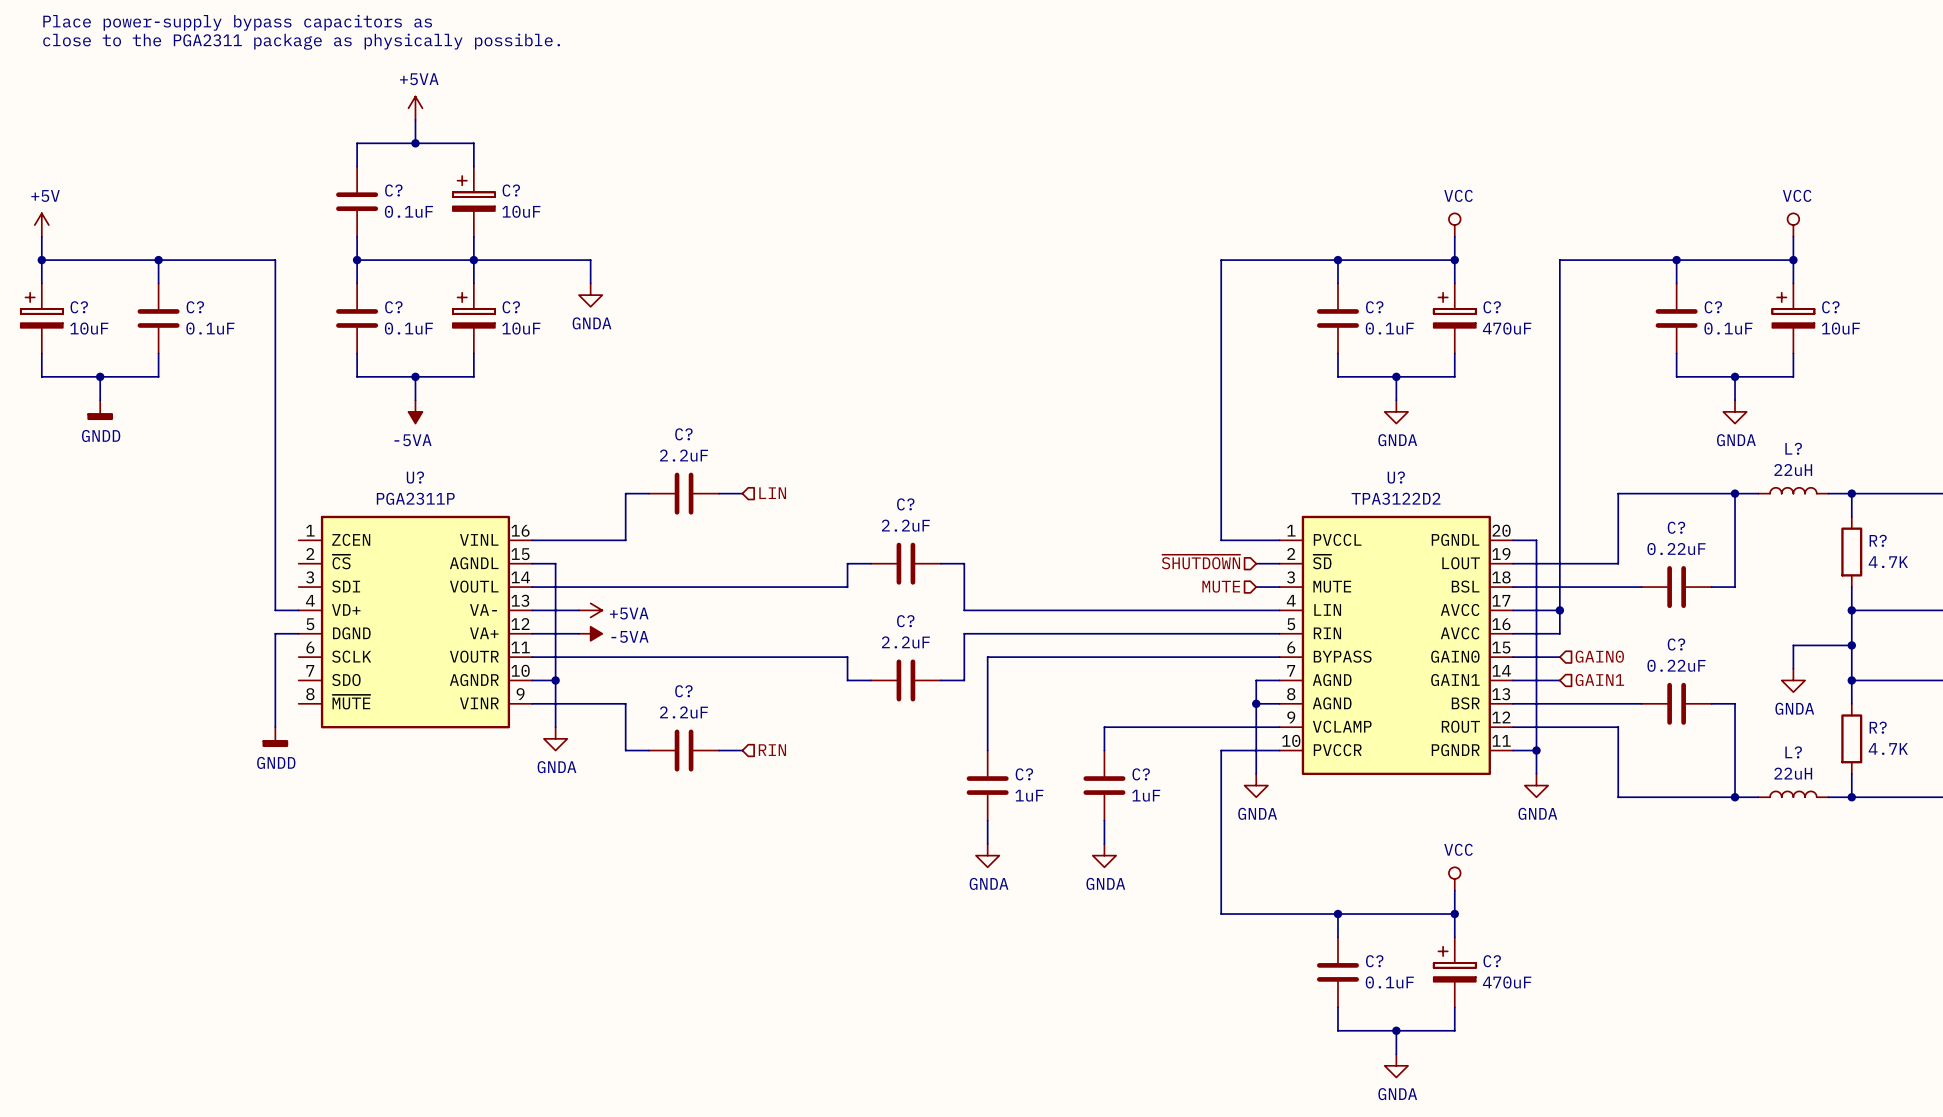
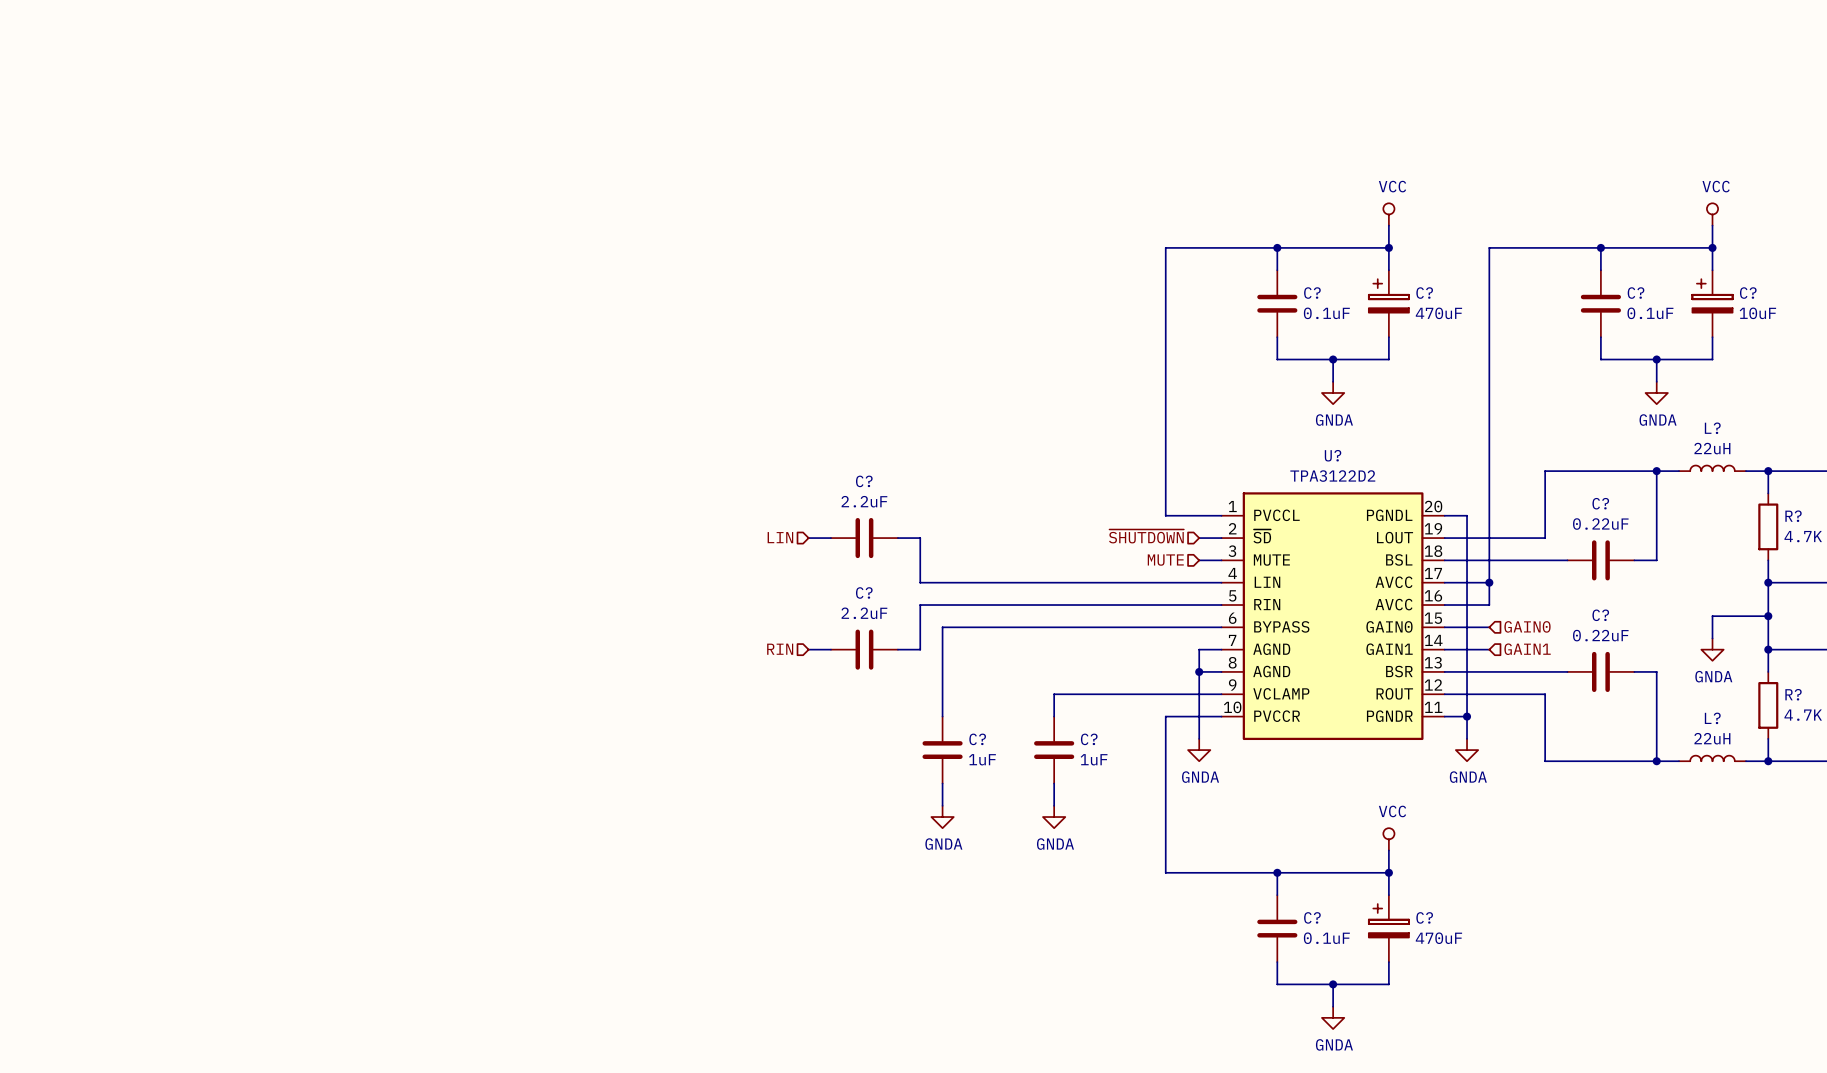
text: Place power-supply bypass capacitors as (237, 22) -> none
text: close to the PGA2311 package as physically possible. (301, 41) -> none
power symbol: +5VA (415, 108) -> none
wire: (415, 119) (415, 143) -> none
junction: (415, 143) -> none
wire: (357, 166) (357, 143) (473, 143) (473, 166) -> none
C?: 0.1uF (357, 201) -> none
C?: 10uF (473, 201) -> none
power symbol: +5V (41, 225) -> none
wire: (41, 236) (41, 283) -> none
wire: (357, 236) (357, 283) -> none
wire: (473, 236) (473, 283) -> none
wire: (41, 260) (275, 260) (275, 610) (298, 610) -> none
junction: (41, 260) -> none
wire: (158, 260) (158, 283) -> none
junction: (158, 260) -> none
wire: (357, 260) (590, 260) (590, 283) -> none
junction: (357, 260) -> none
junction: (473, 260) -> none
power symbol: GNDA (590, 295) -> none
C?: 10uF (41, 318) -> none
C?: 0.1uF (158, 318) -> none
C?: 0.1uF (357, 318) -> none
C?: 10uF (473, 318) -> none
wire: (41, 353) (41, 376) (158, 376) (158, 353) -> none
wire: (357, 353) (357, 376) (473, 376) (473, 353) -> none
wire: (100, 376) (100, 400) -> none
junction: (100, 376) -> none
wire: (415, 376) (415, 400) -> none
junction: (415, 376) -> none
power symbol: GNDD (100, 410) -> none
power symbol: -5VA (415, 411) -> none
wire: (649, 493) (625, 493) (625, 540) (532, 540) -> none
C?: 2.2uF (684, 493) -> none
wire: (719, 493) (742, 493) -> none
hierarchical label rotation: 0° (772, 493) -> 180° (780, 537)
hierarchical label position: LIN (772, 493) -> LIN (780, 537)
wire: (532, 563) (555, 563) (555, 727) -> none
wire: (847, 563) (847, 587) (532, 587) -> none
wire: (532, 610) (578, 610) -> none
power symbol: +5VA (590, 610) -> none
U?: PGA2311P (415, 622) -> none
wire: (298, 633) (275, 633) (275, 727) -> none
wire: (532, 633) (578, 633) -> none
power symbol: -5VA (590, 633) -> none
wire: (532, 657) (847, 657) (847, 680) -> none
wire: (532, 680) (555, 680) -> none
junction: (555, 680) -> none
wire: (532, 703) (625, 703) (625, 750) (649, 750) -> none
power symbol: GNDD (275, 737) -> none
power symbol: GNDA (555, 738) -> none
C?: 2.2uF (684, 750) -> none
wire: (719, 750) (742, 750) -> none
hierarchical label rotation: 0° (772, 750) -> 180° (780, 649)
hierarchical label position: RIN (772, 750) -> RIN (780, 649)

